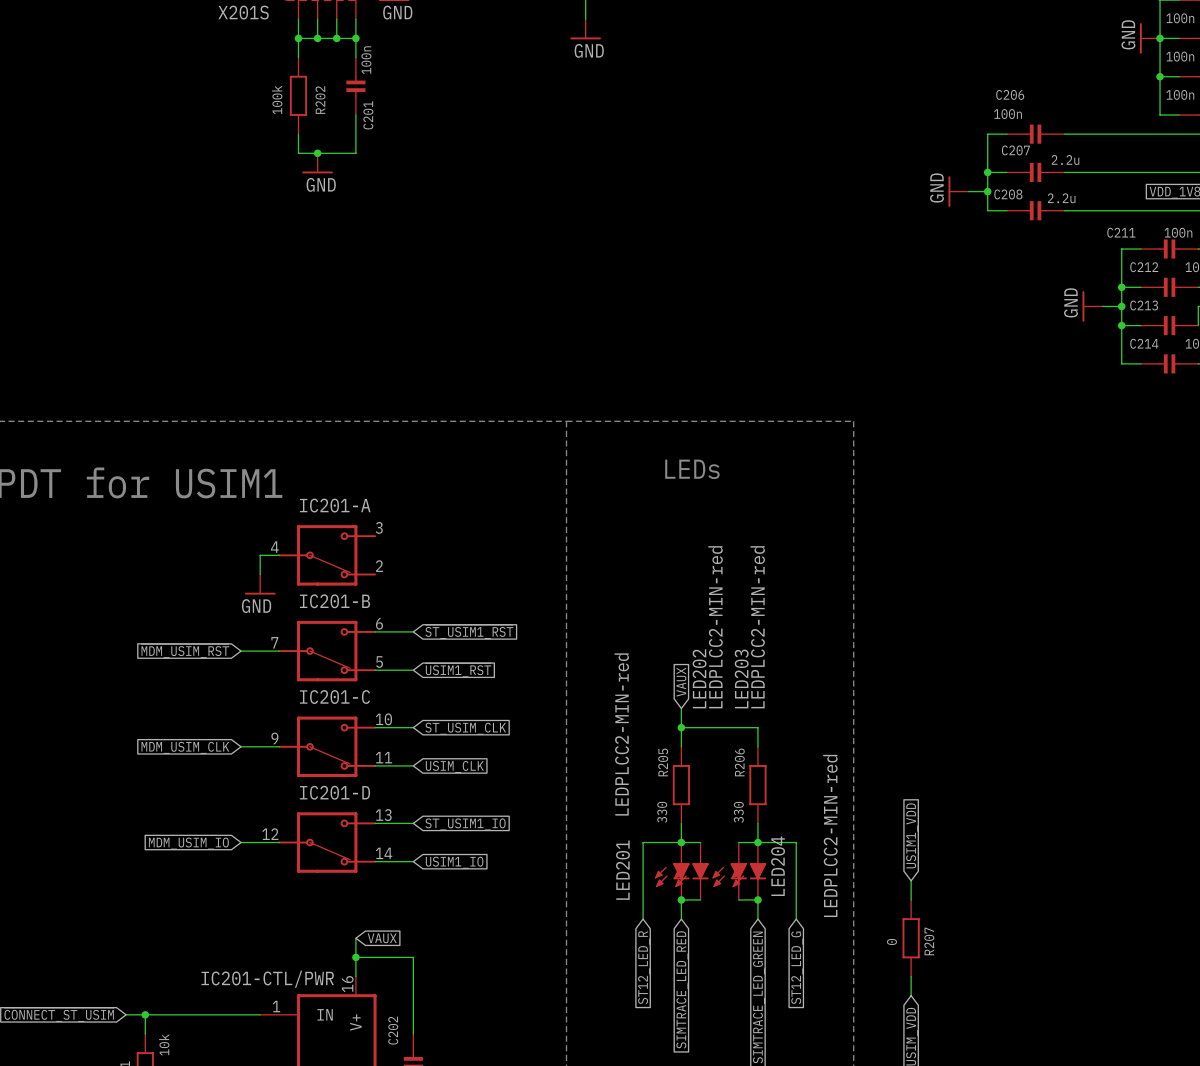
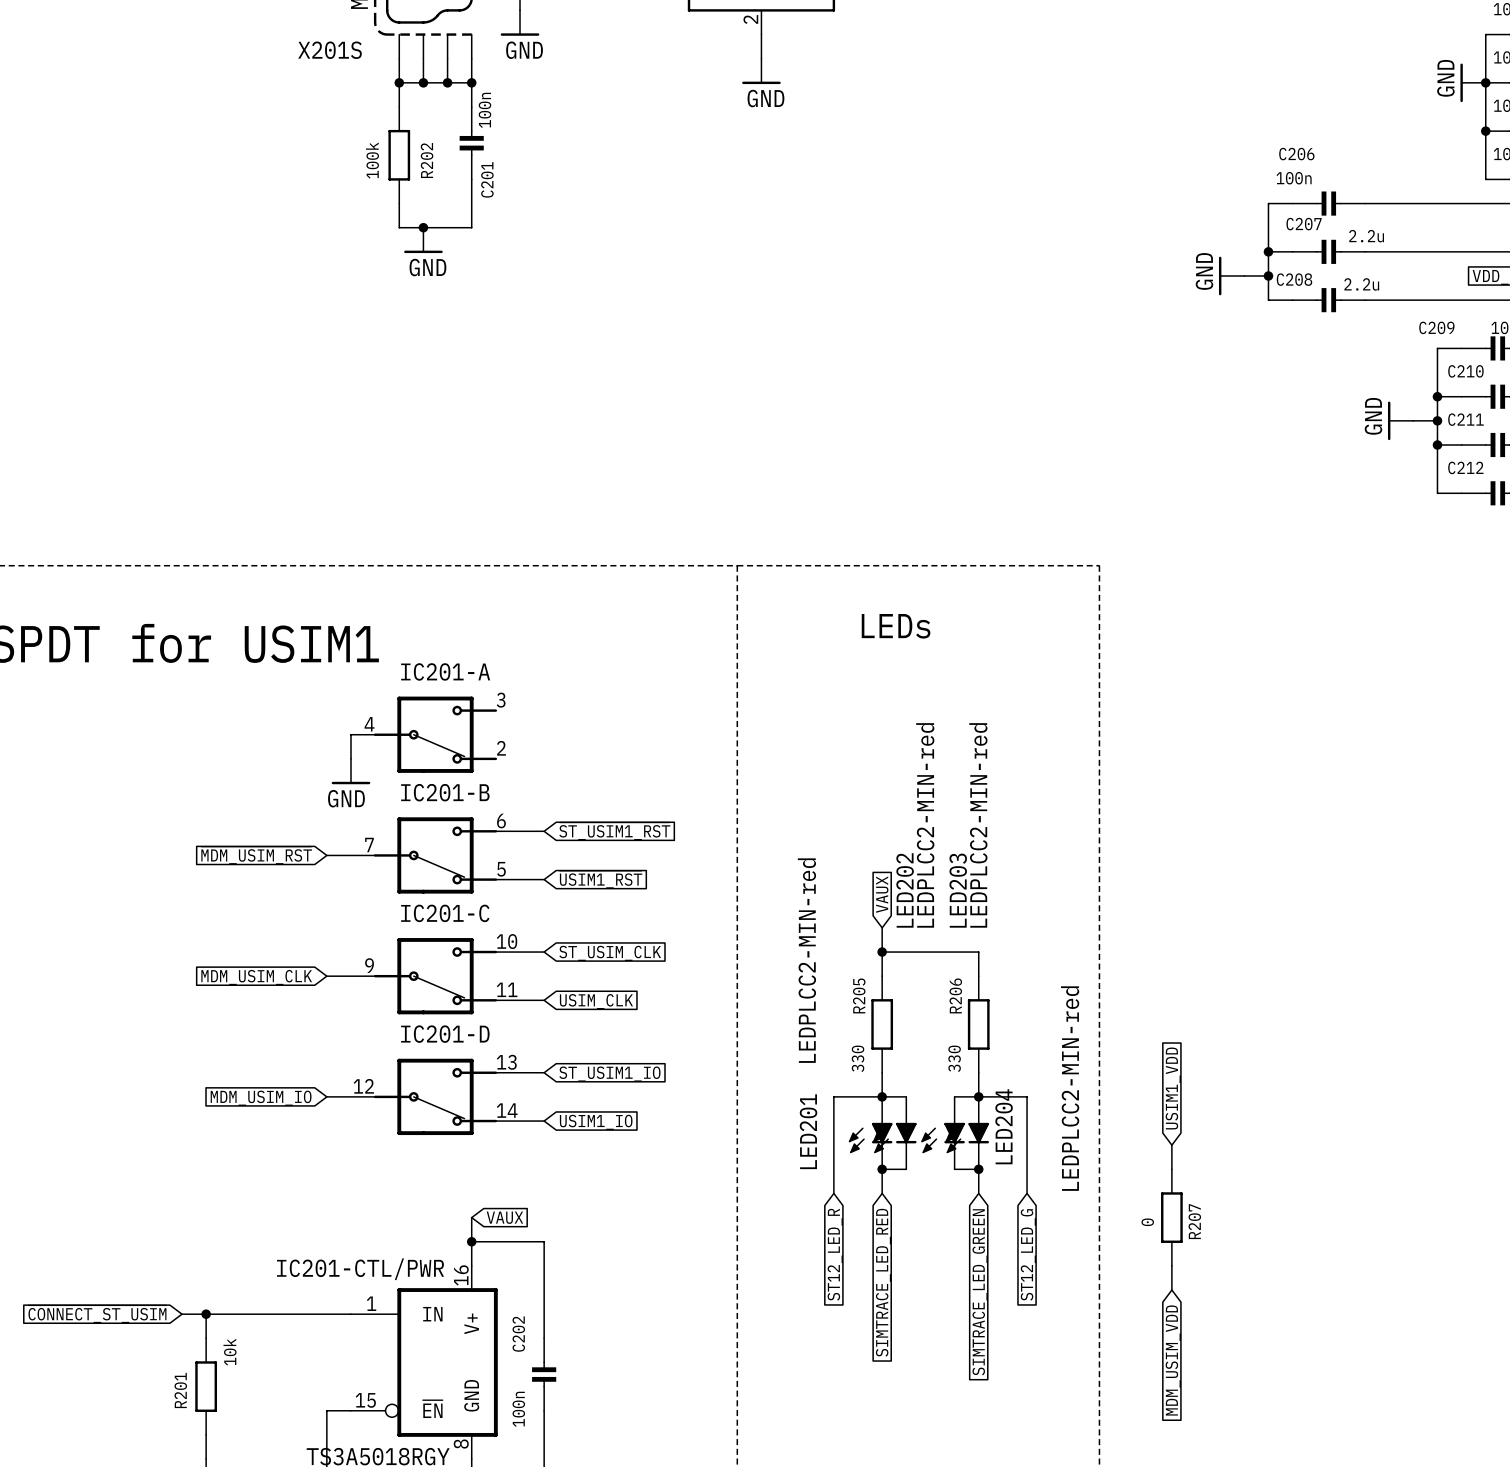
C211 name: C211 (1121, 232) -> C209 (1436, 327)
C212 name: C212 (1144, 267) -> C210 (1465, 371)
C213 name: C213 (1144, 305) -> C211 (1465, 419)
C214 name: C214 (1144, 343) -> C212 (1465, 467)

